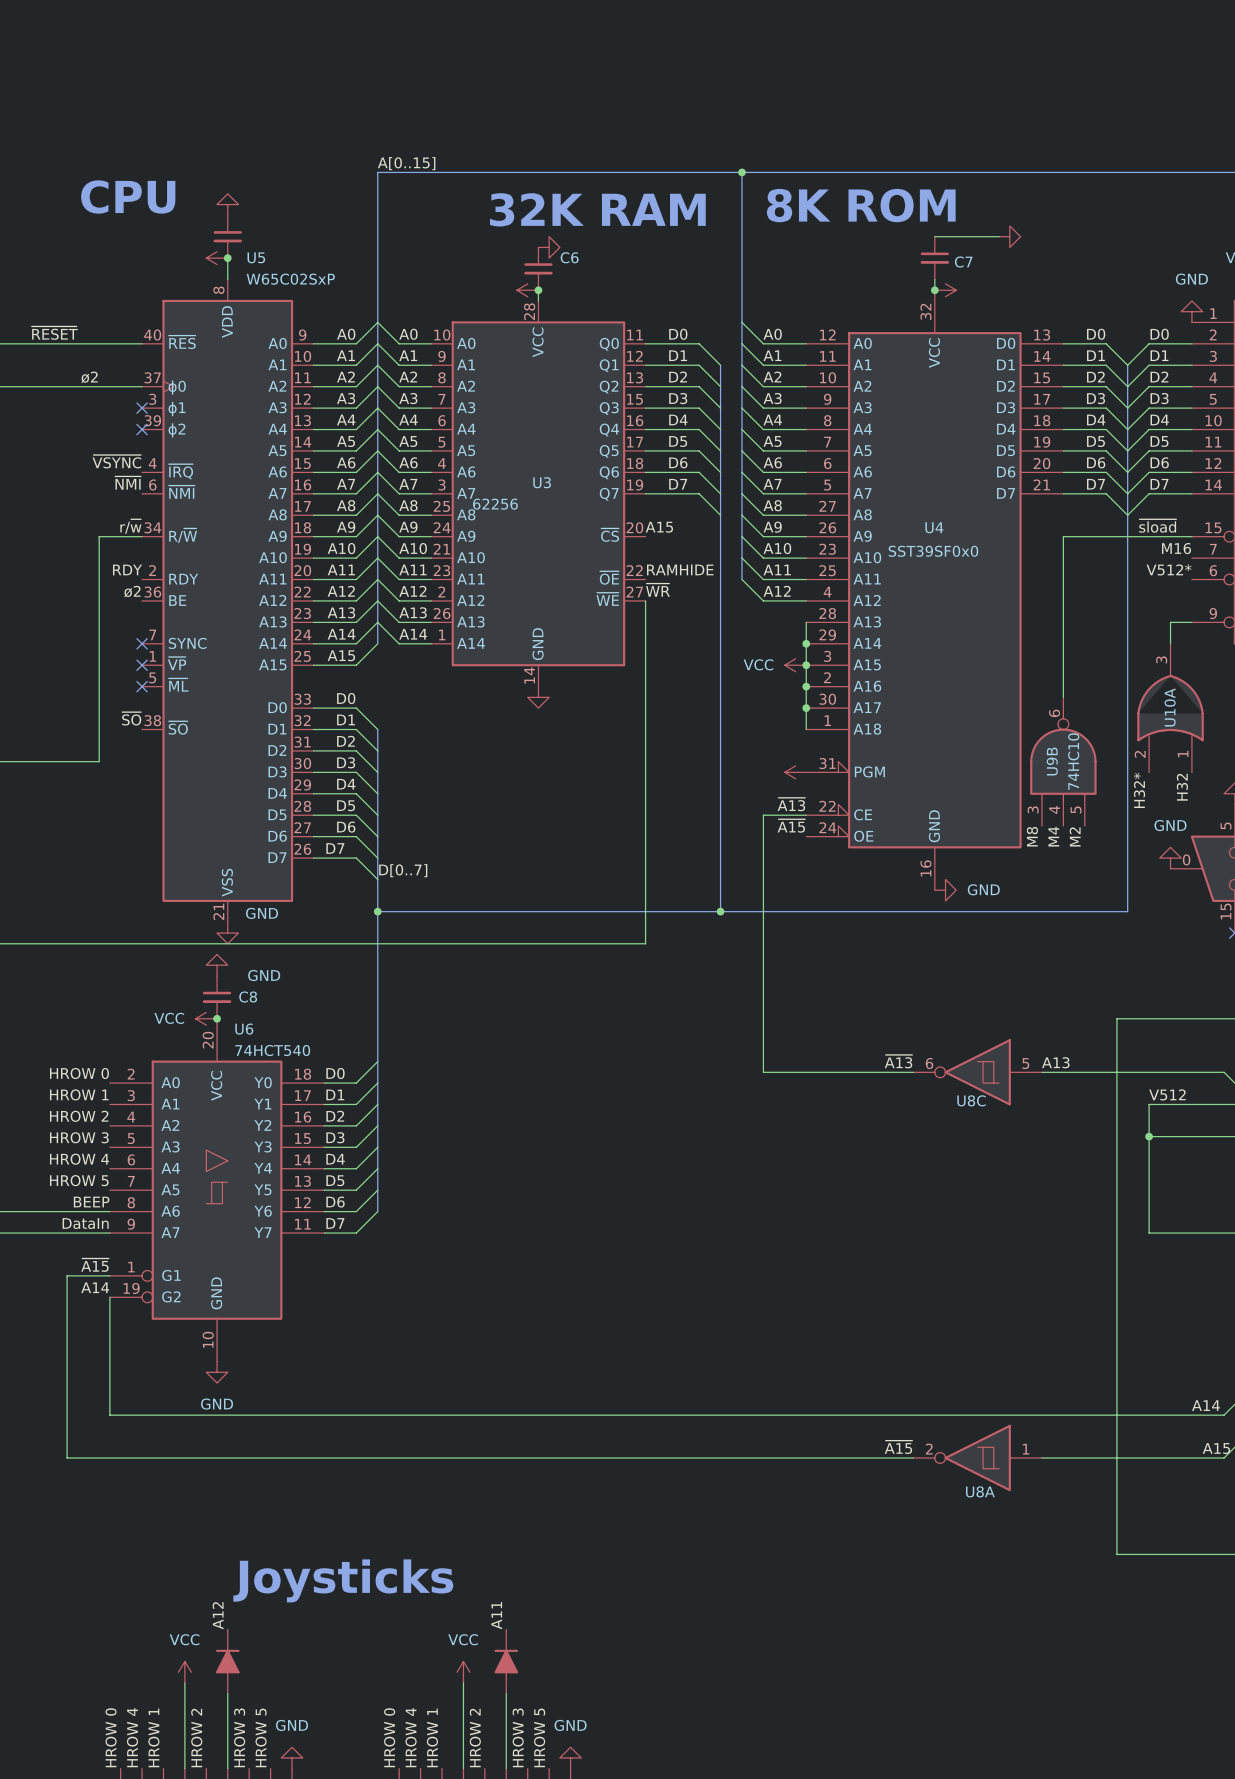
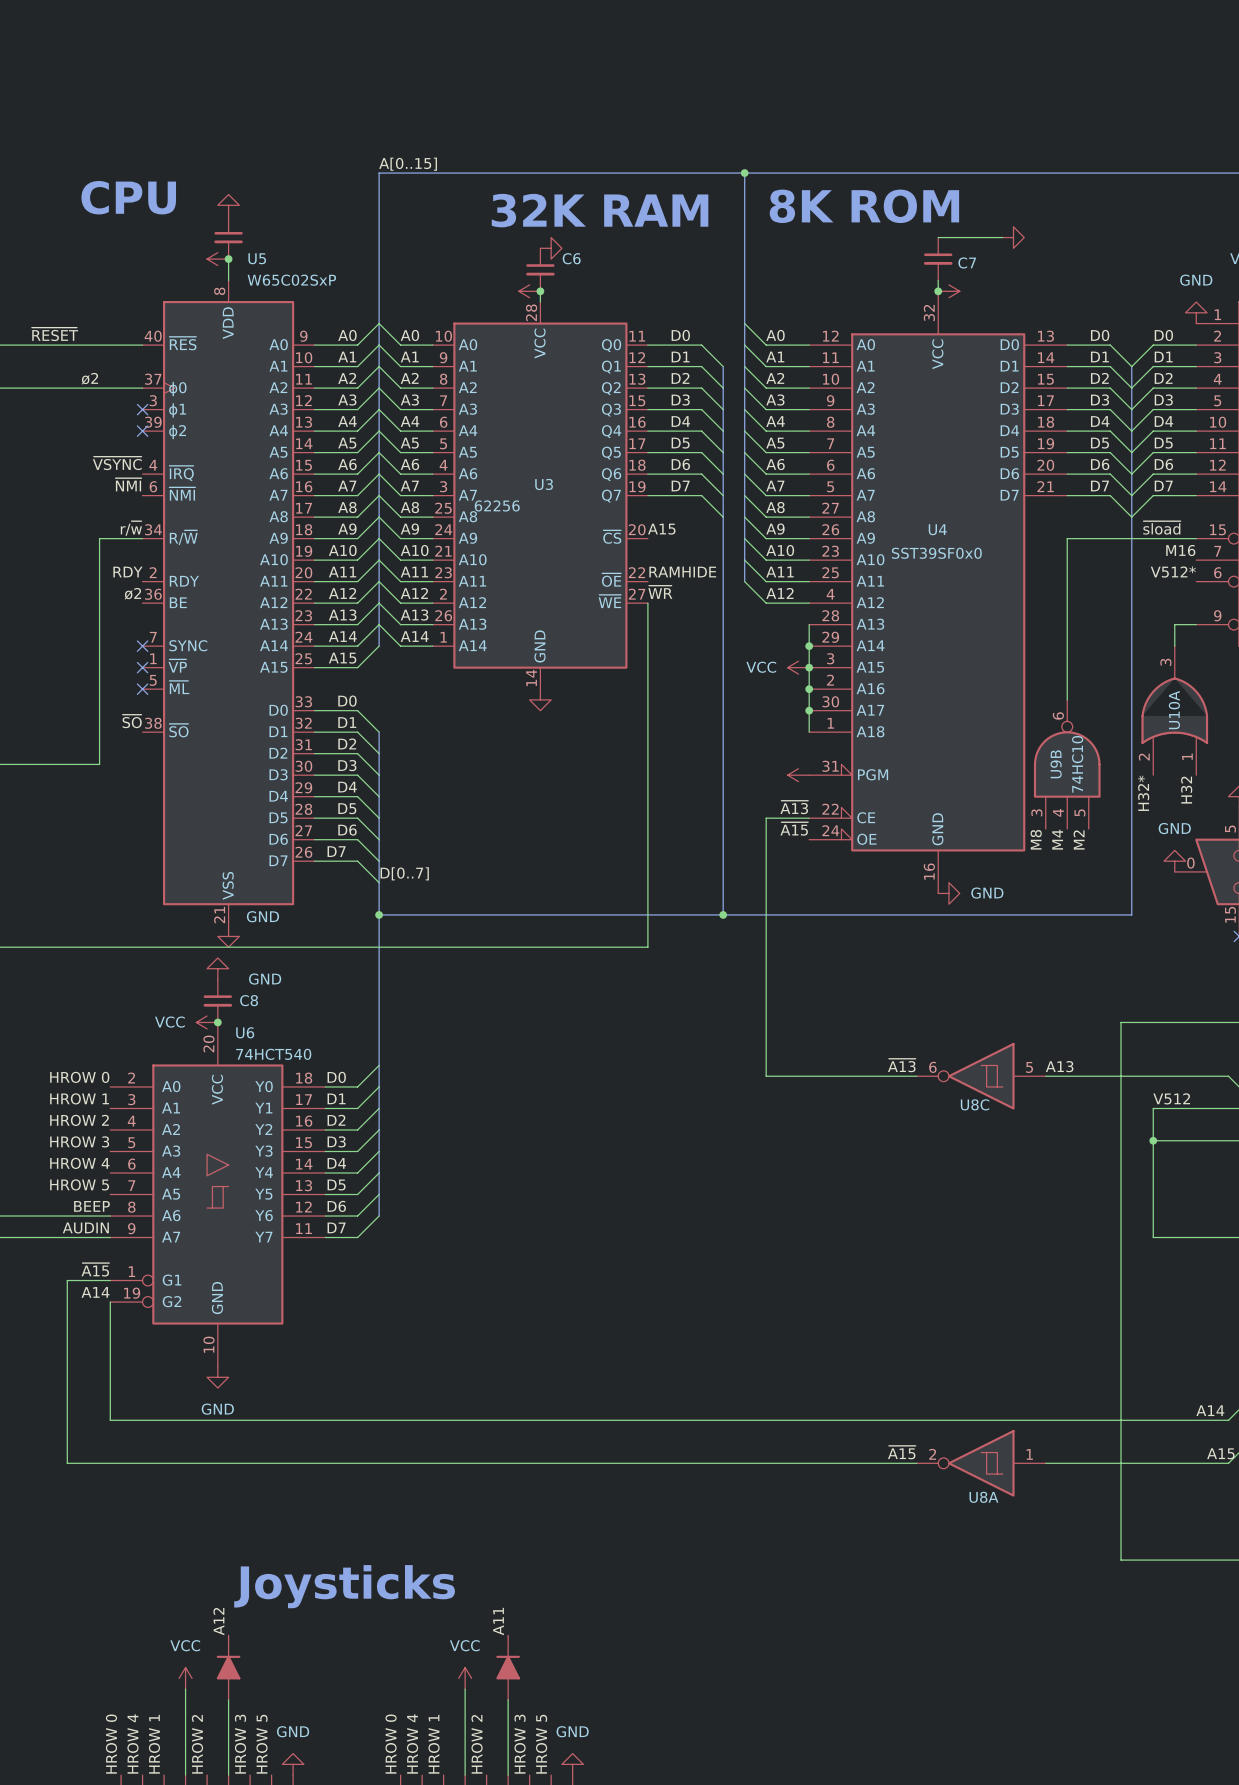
label: DataIn (85, 1223) -> AUDIN (85, 1228)

